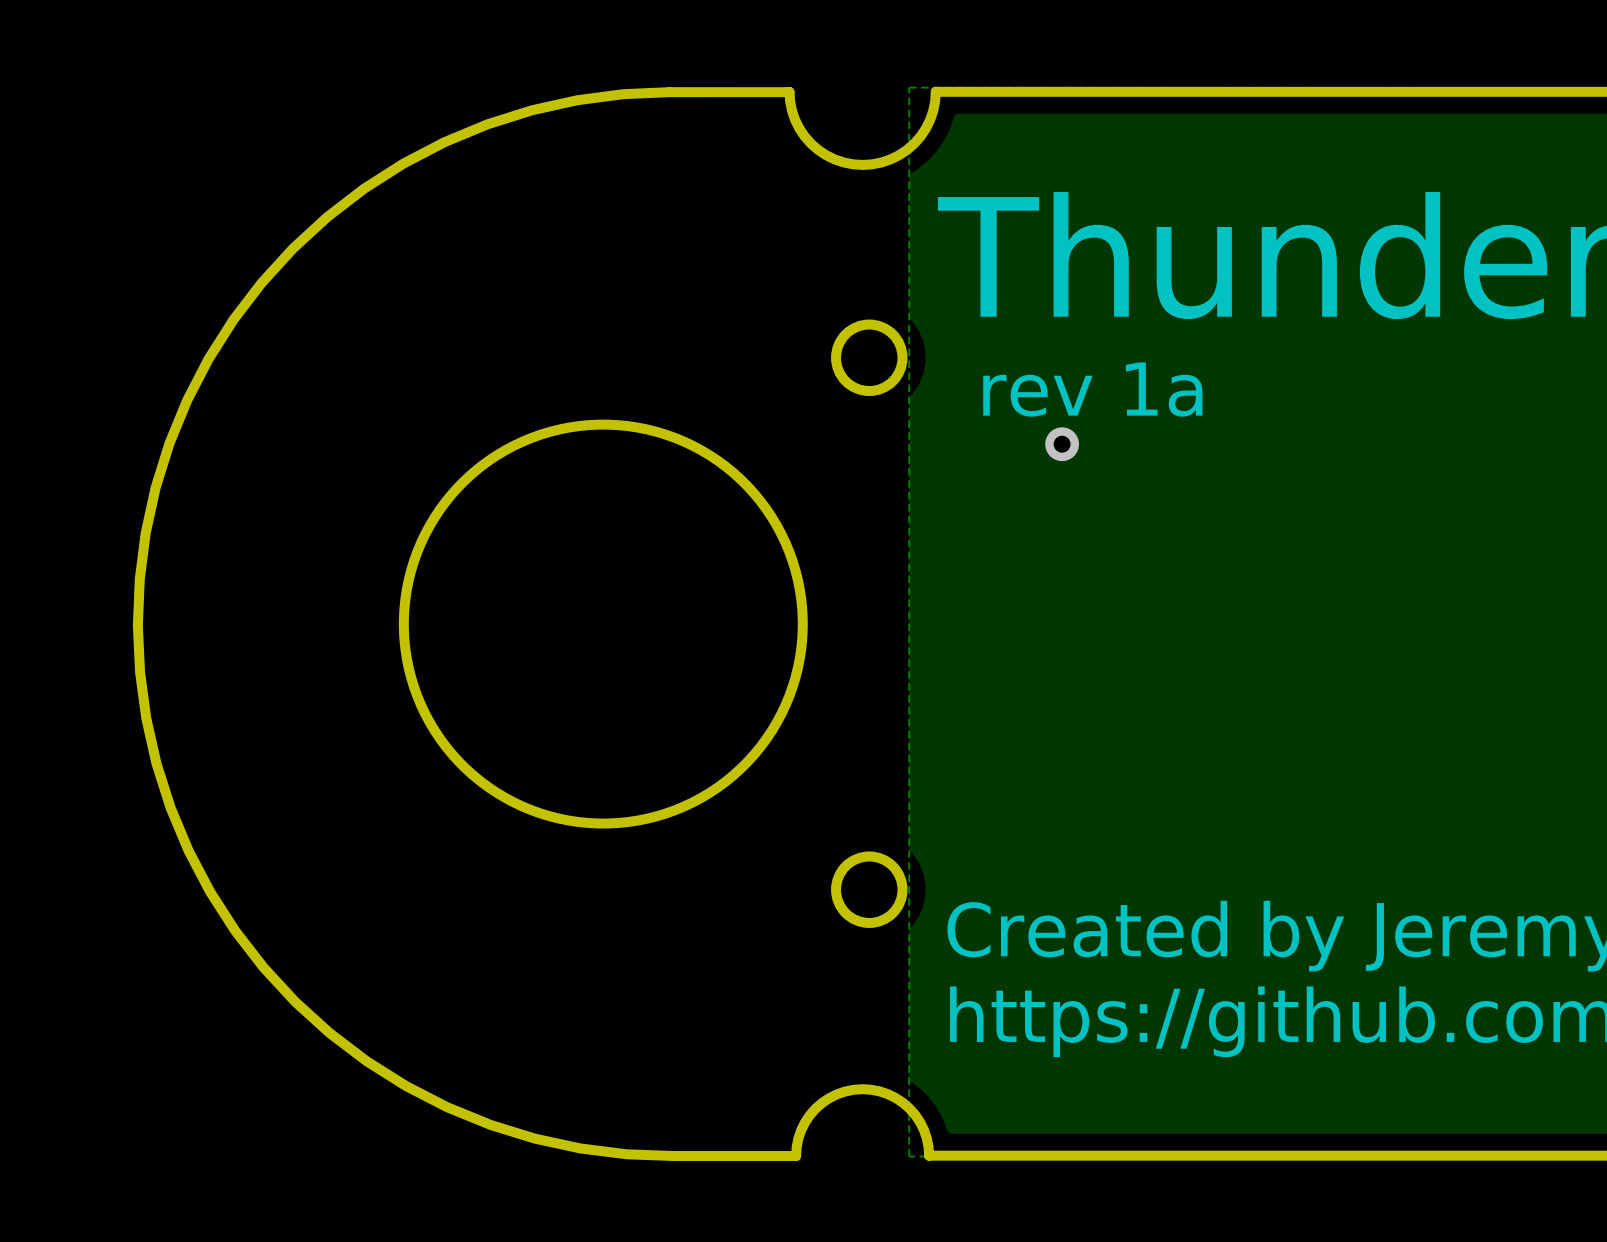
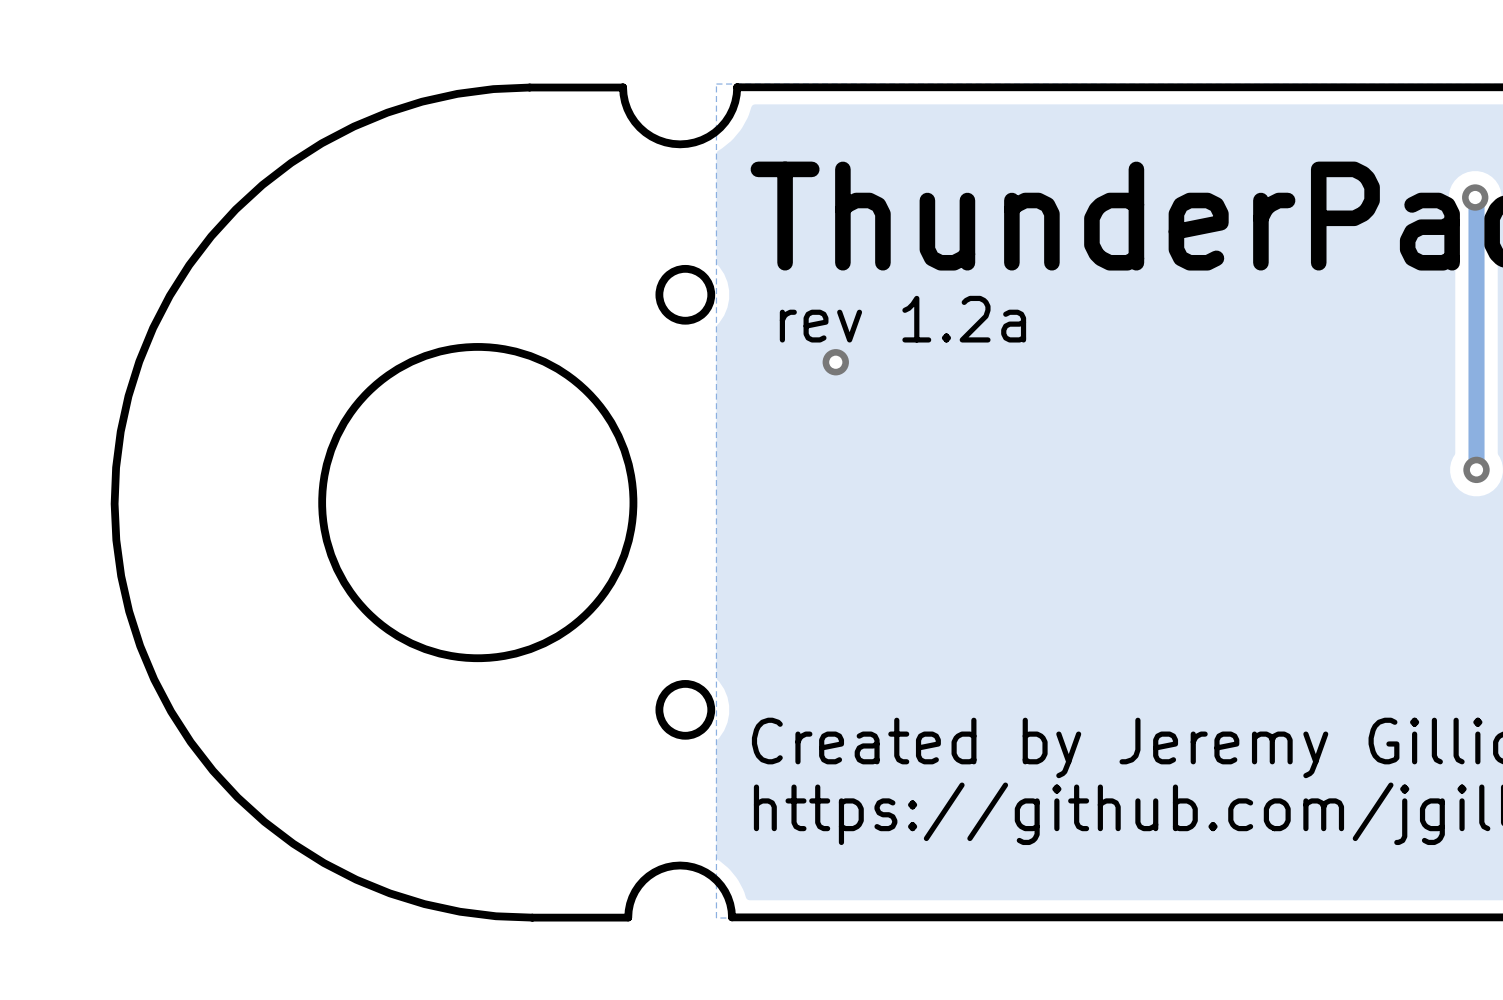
text: rev 1a (1092, 389) -> rev 1.2a (902, 319)

